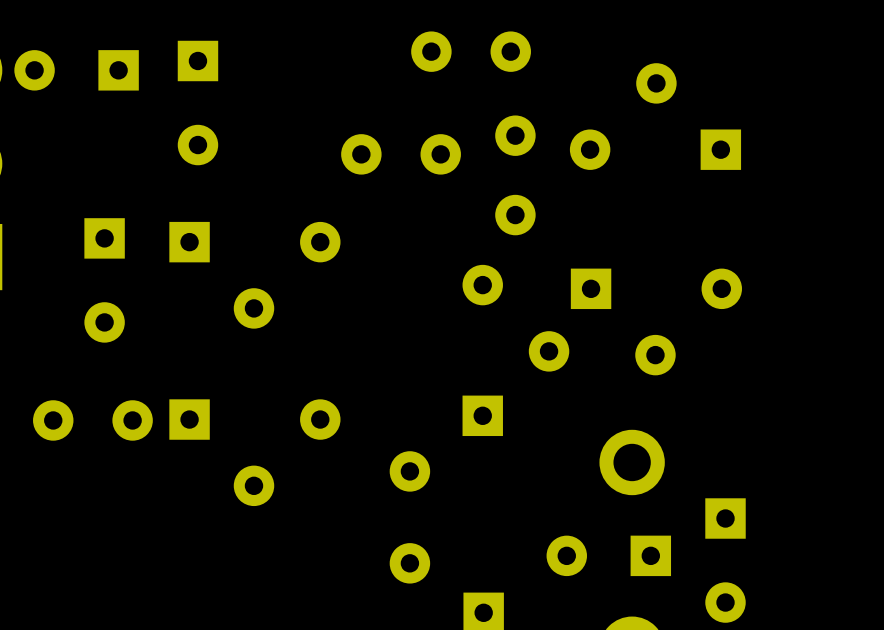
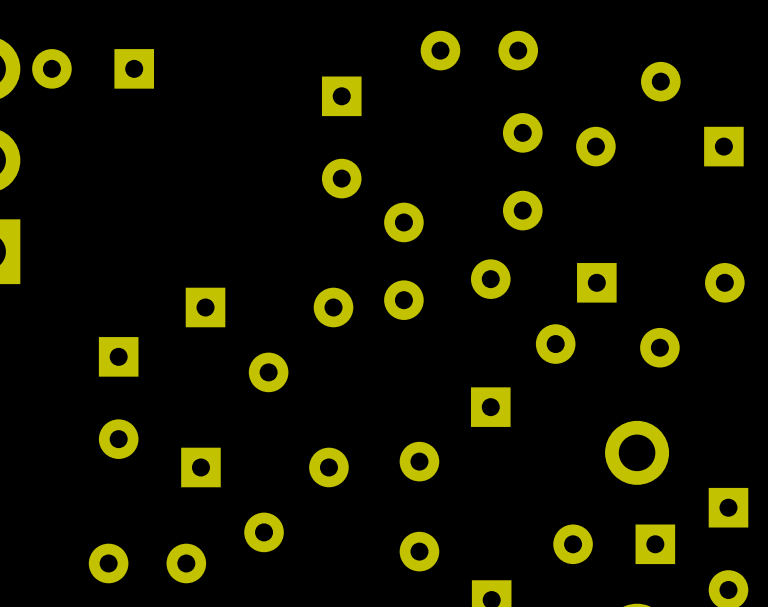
part: (197, 103) -> none
part: none -> (341, 137)
part rotation: 0° (401, 154) -> 90° clockwise (403, 261)
part position: (401, 154) -> (403, 261)
part: (254, 275) -> none
part: (104, 280) -> none
part: none -> (269, 339)
part footprint: [33, 400, 153, 441] -> [98, 337, 139, 459]
part: (254, 452) -> none
part: none -> (264, 499)
part: none -> (147, 563)

